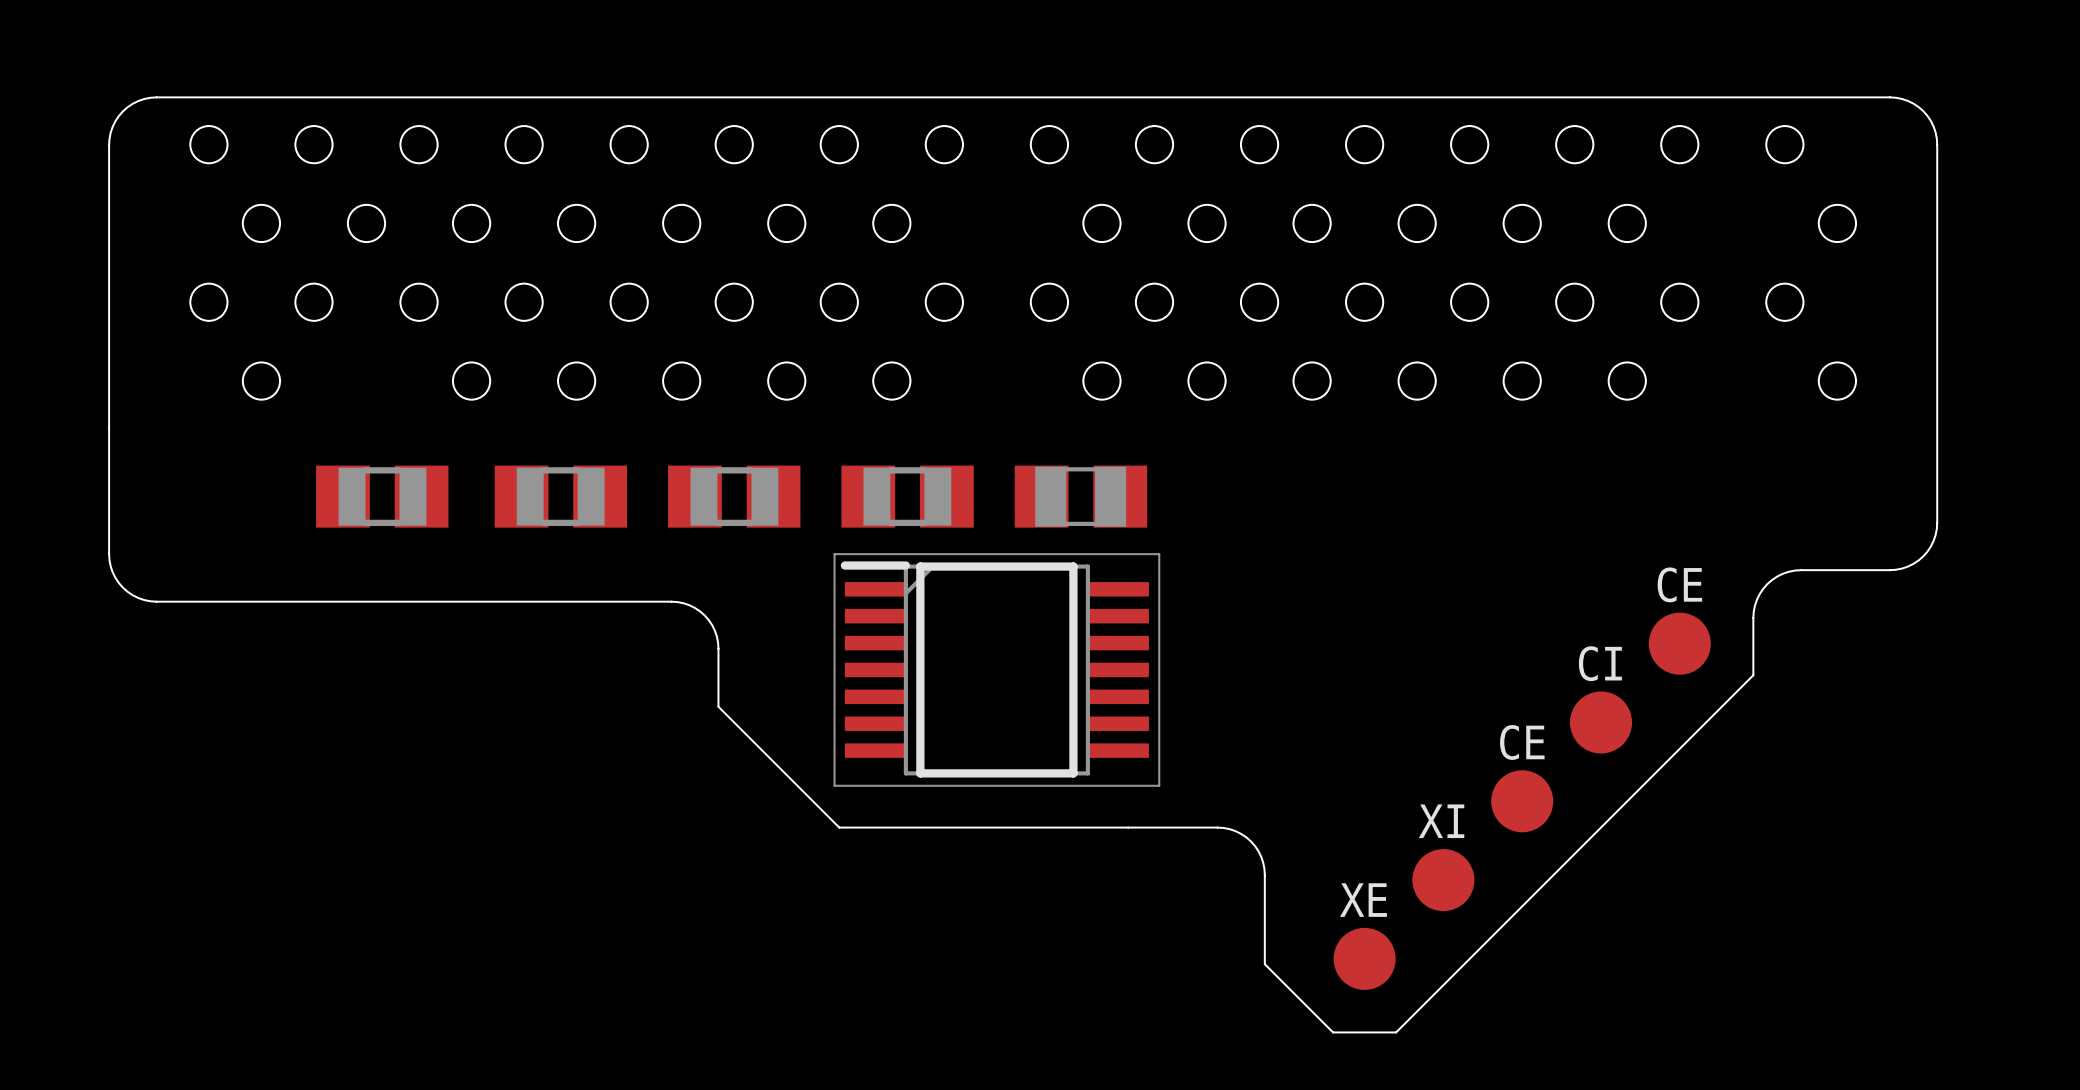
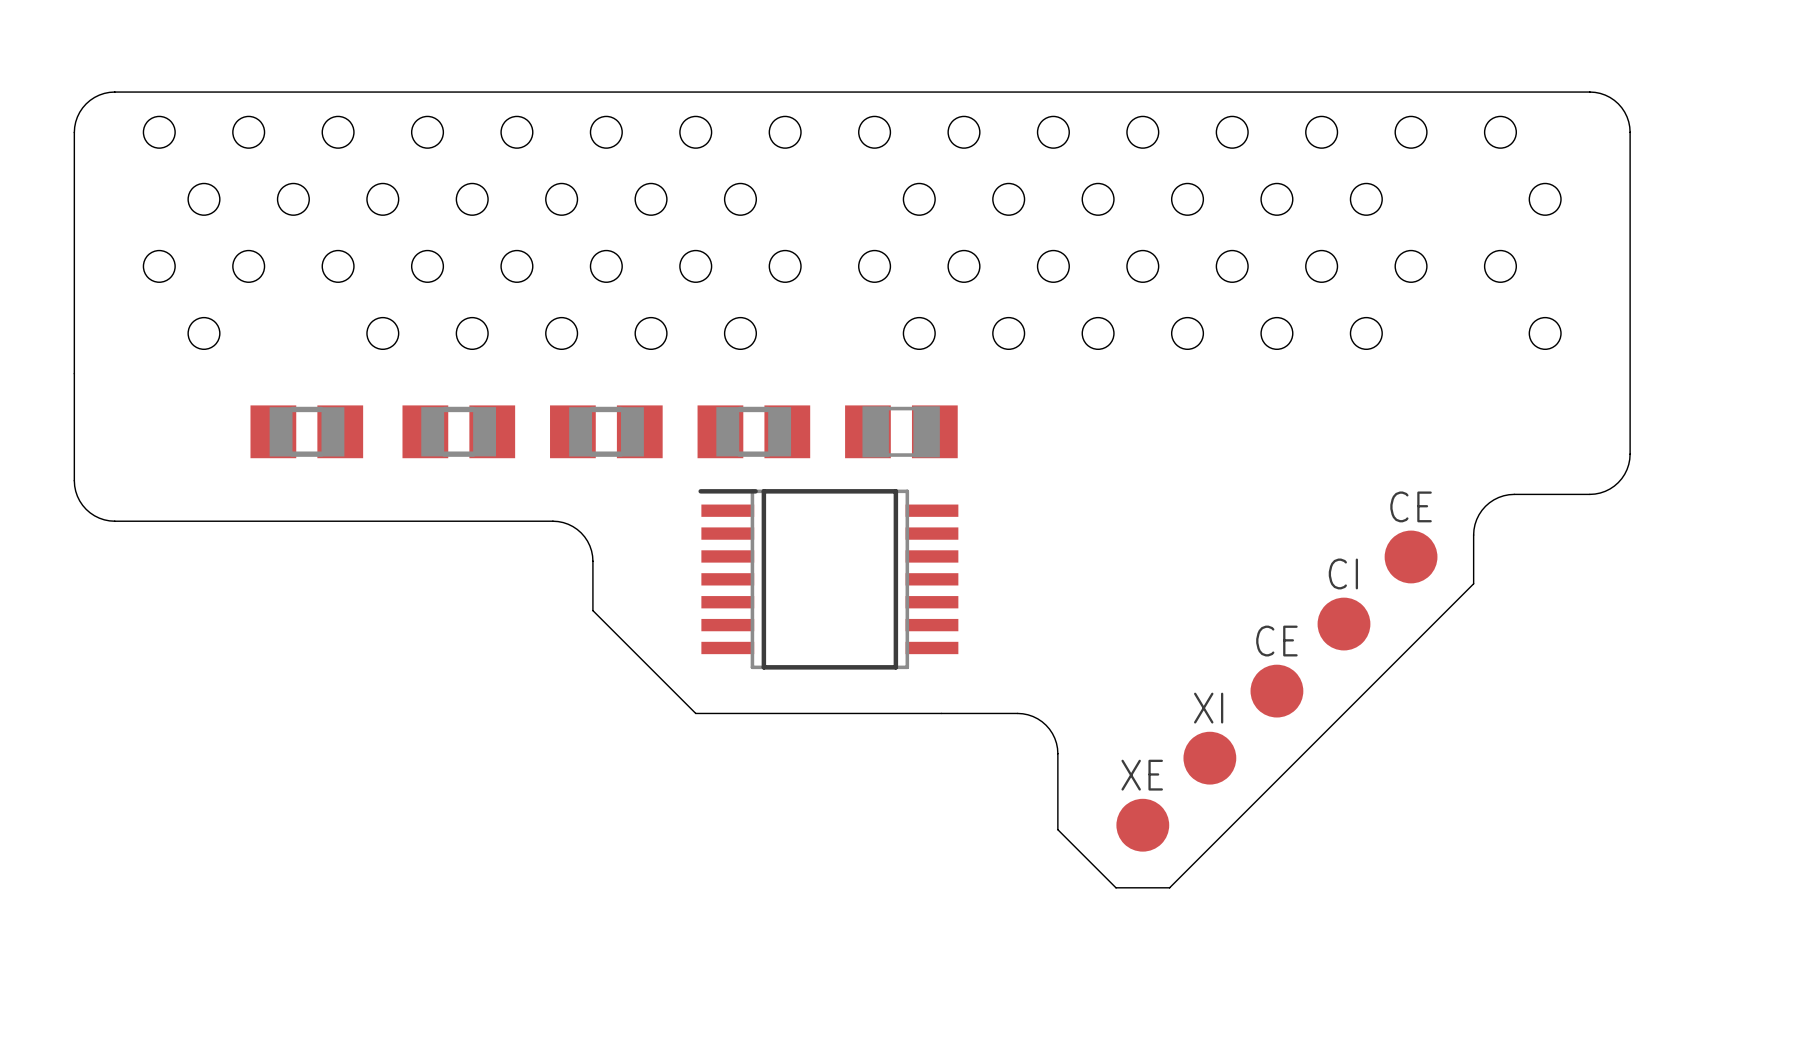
part footprint: [833, 553, 1161, 787] -> [698, 489, 959, 670]

